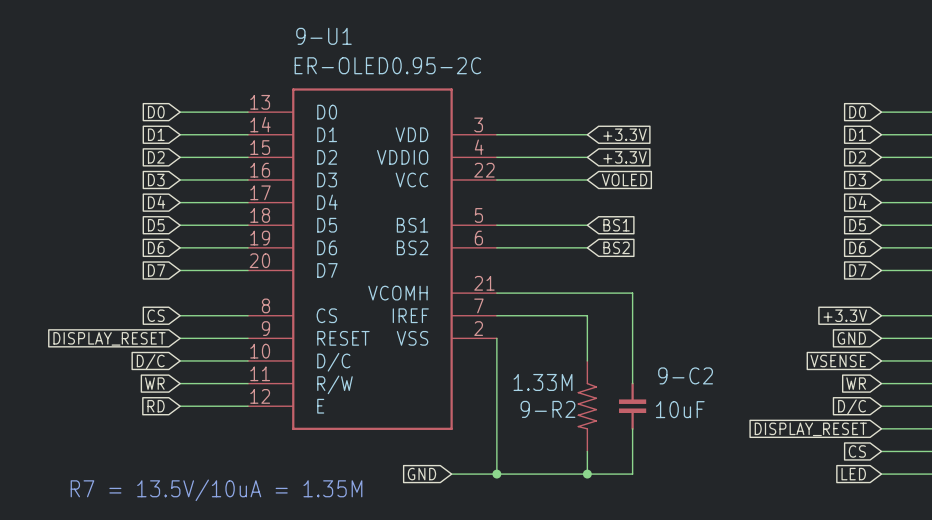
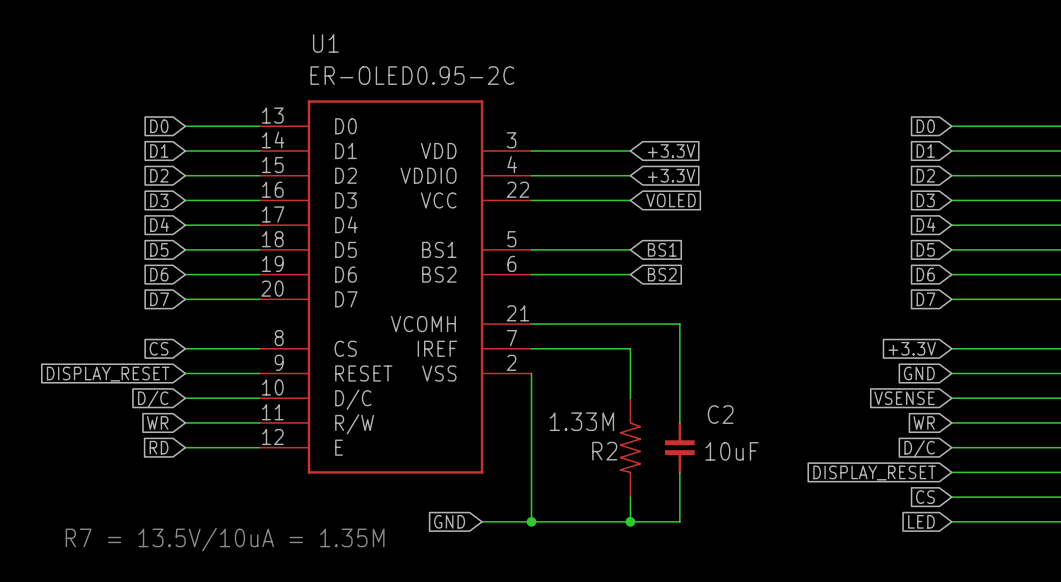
9-U1 name: 9-U1 (323, 36) -> U1 (325, 43)
9-C2 name: 9-C2 (685, 375) -> C2 (720, 414)
9-R2 name: 9-R2 (547, 409) -> R2 (604, 451)

